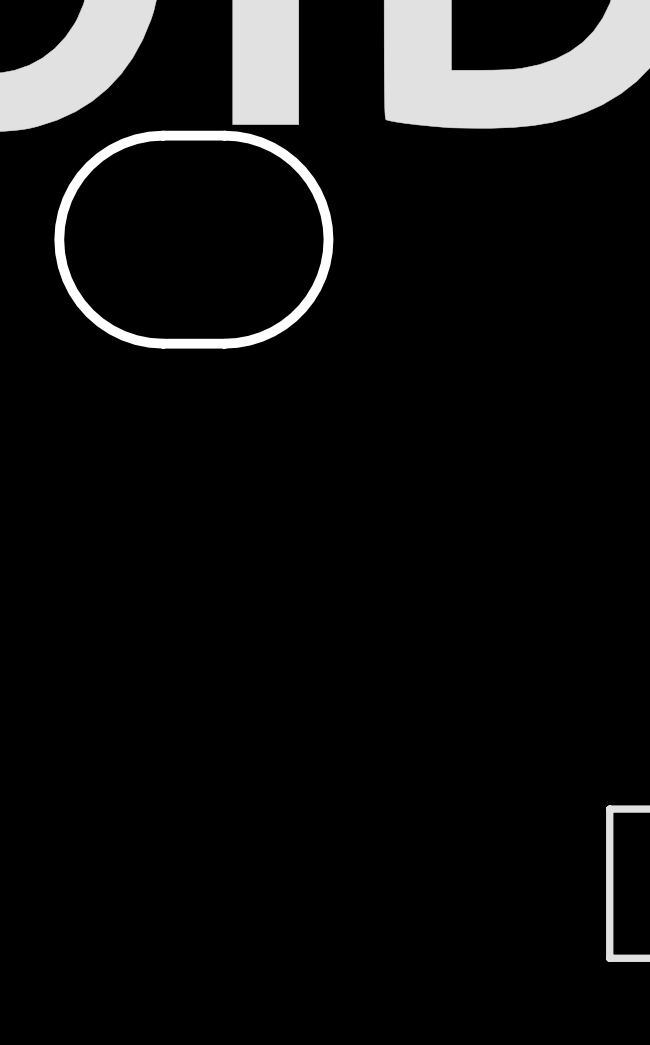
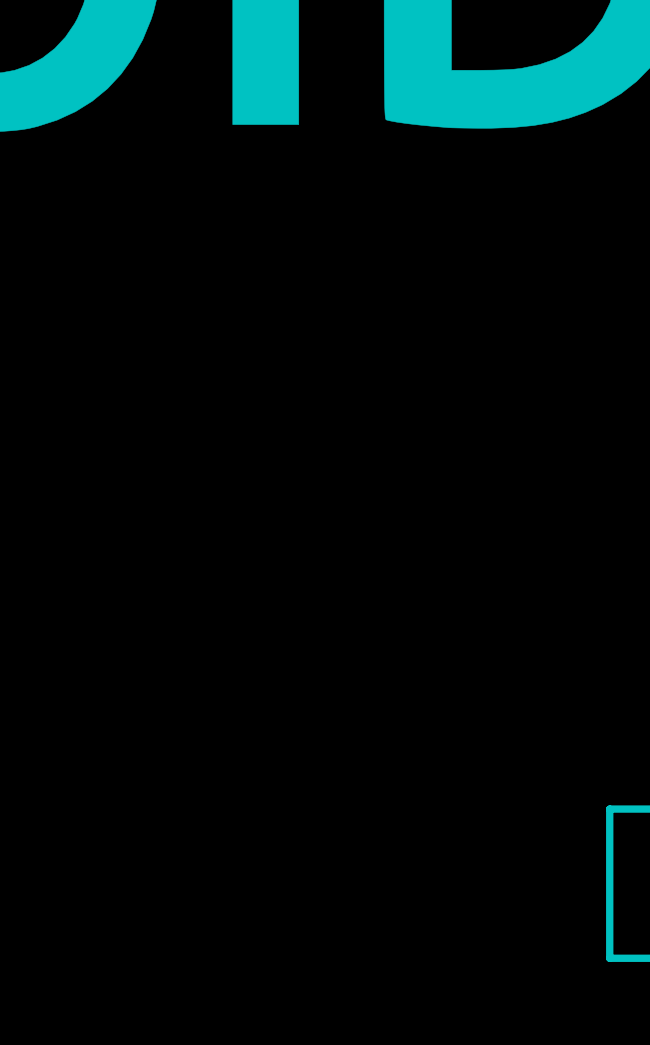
board edge: (163, 135) (237, 136) (261, 142) (283, 154) (293, 161) (310, 180) (316, 191) (321, 202) (327, 227) (328, 239) (325, 264) (321, 276) (310, 298) (293, 317) (272, 331) (249, 340) (237, 342) (163, 343) (136, 340) (123, 335) (99, 322) (80, 302) (73, 291) (62, 266) (59, 239) (62, 212) (73, 187) (89, 166) (111, 149) (136, 139) (163, 135) -> none

